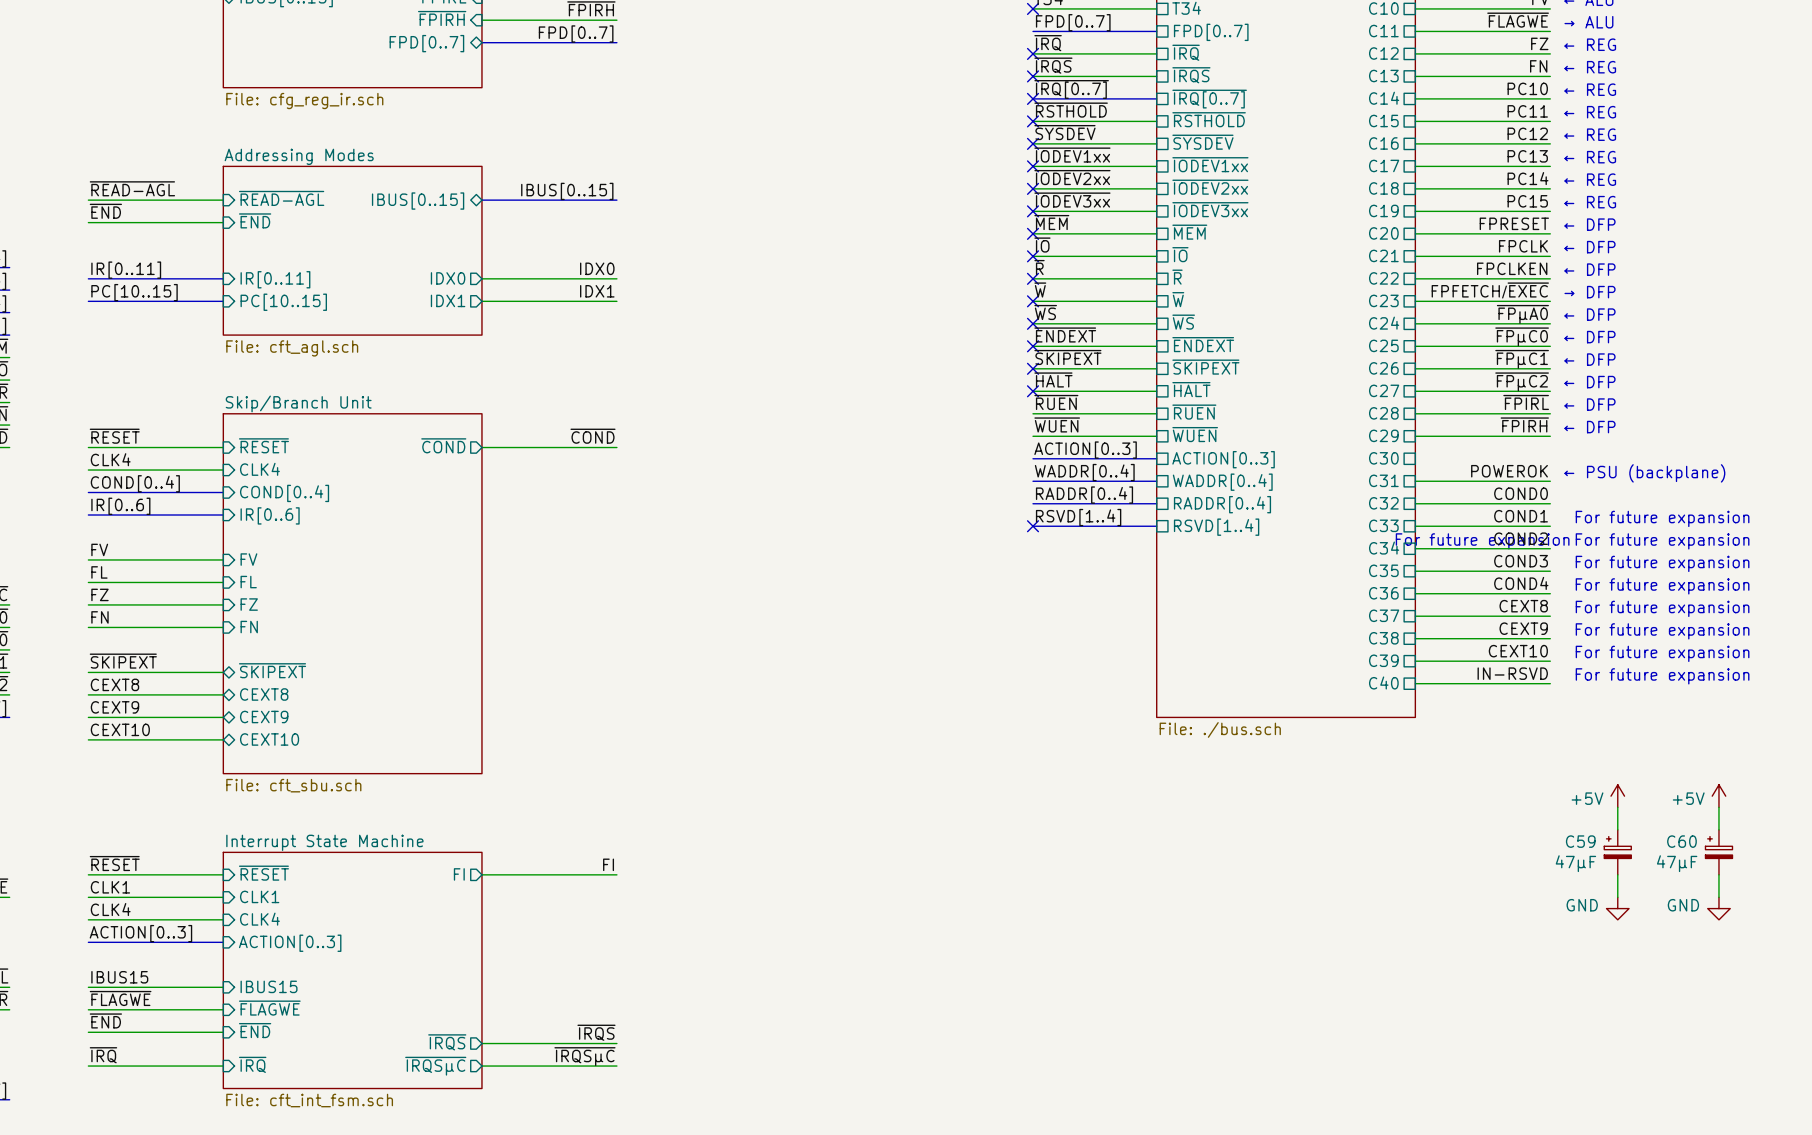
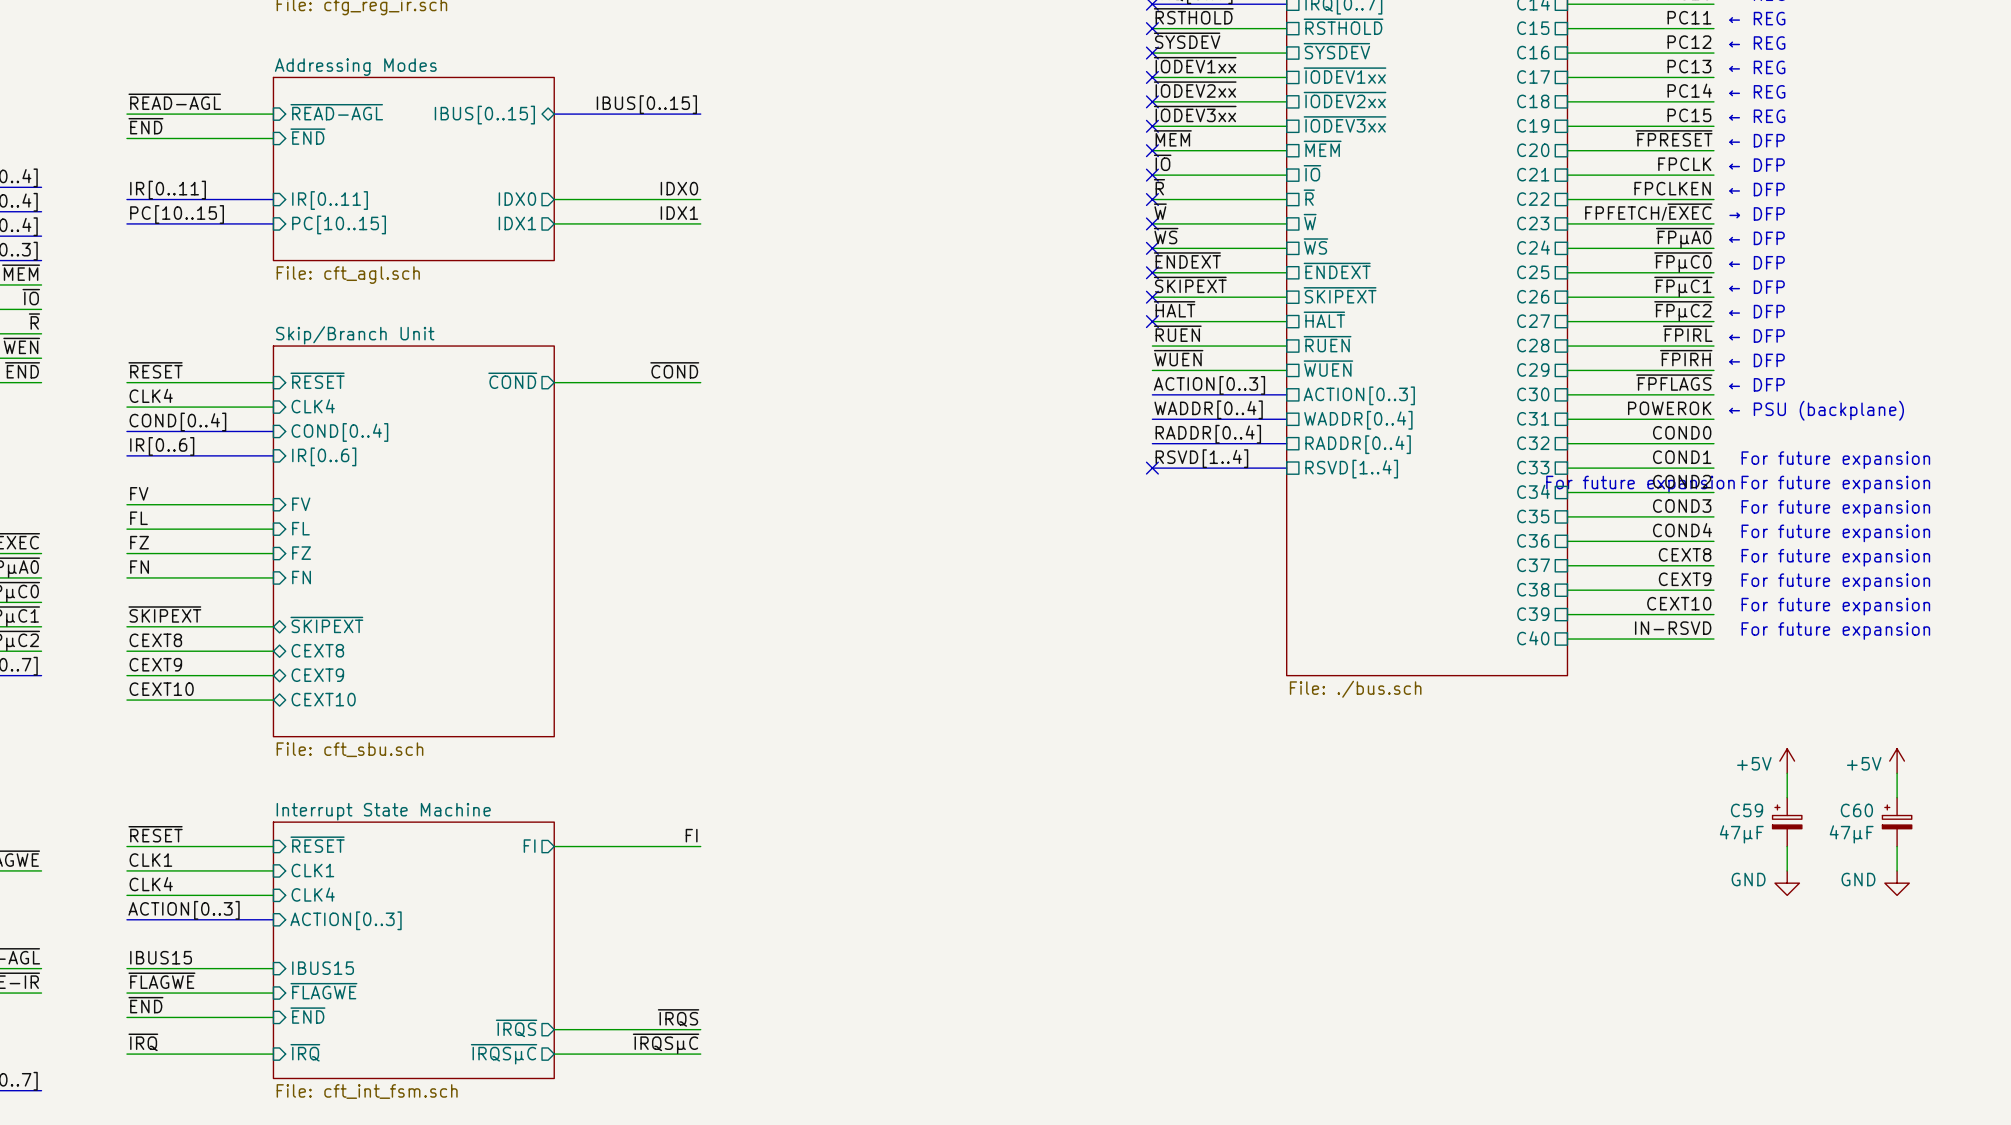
label: FPRESET (1514, 223) -> ~{FPRESET} (1674, 138)
label: none -> ~{FPFLAGS} (1674, 382)
text: none -> ← DFP (1757, 384)
wire: none -> (1567, 394) (1713, 394)

